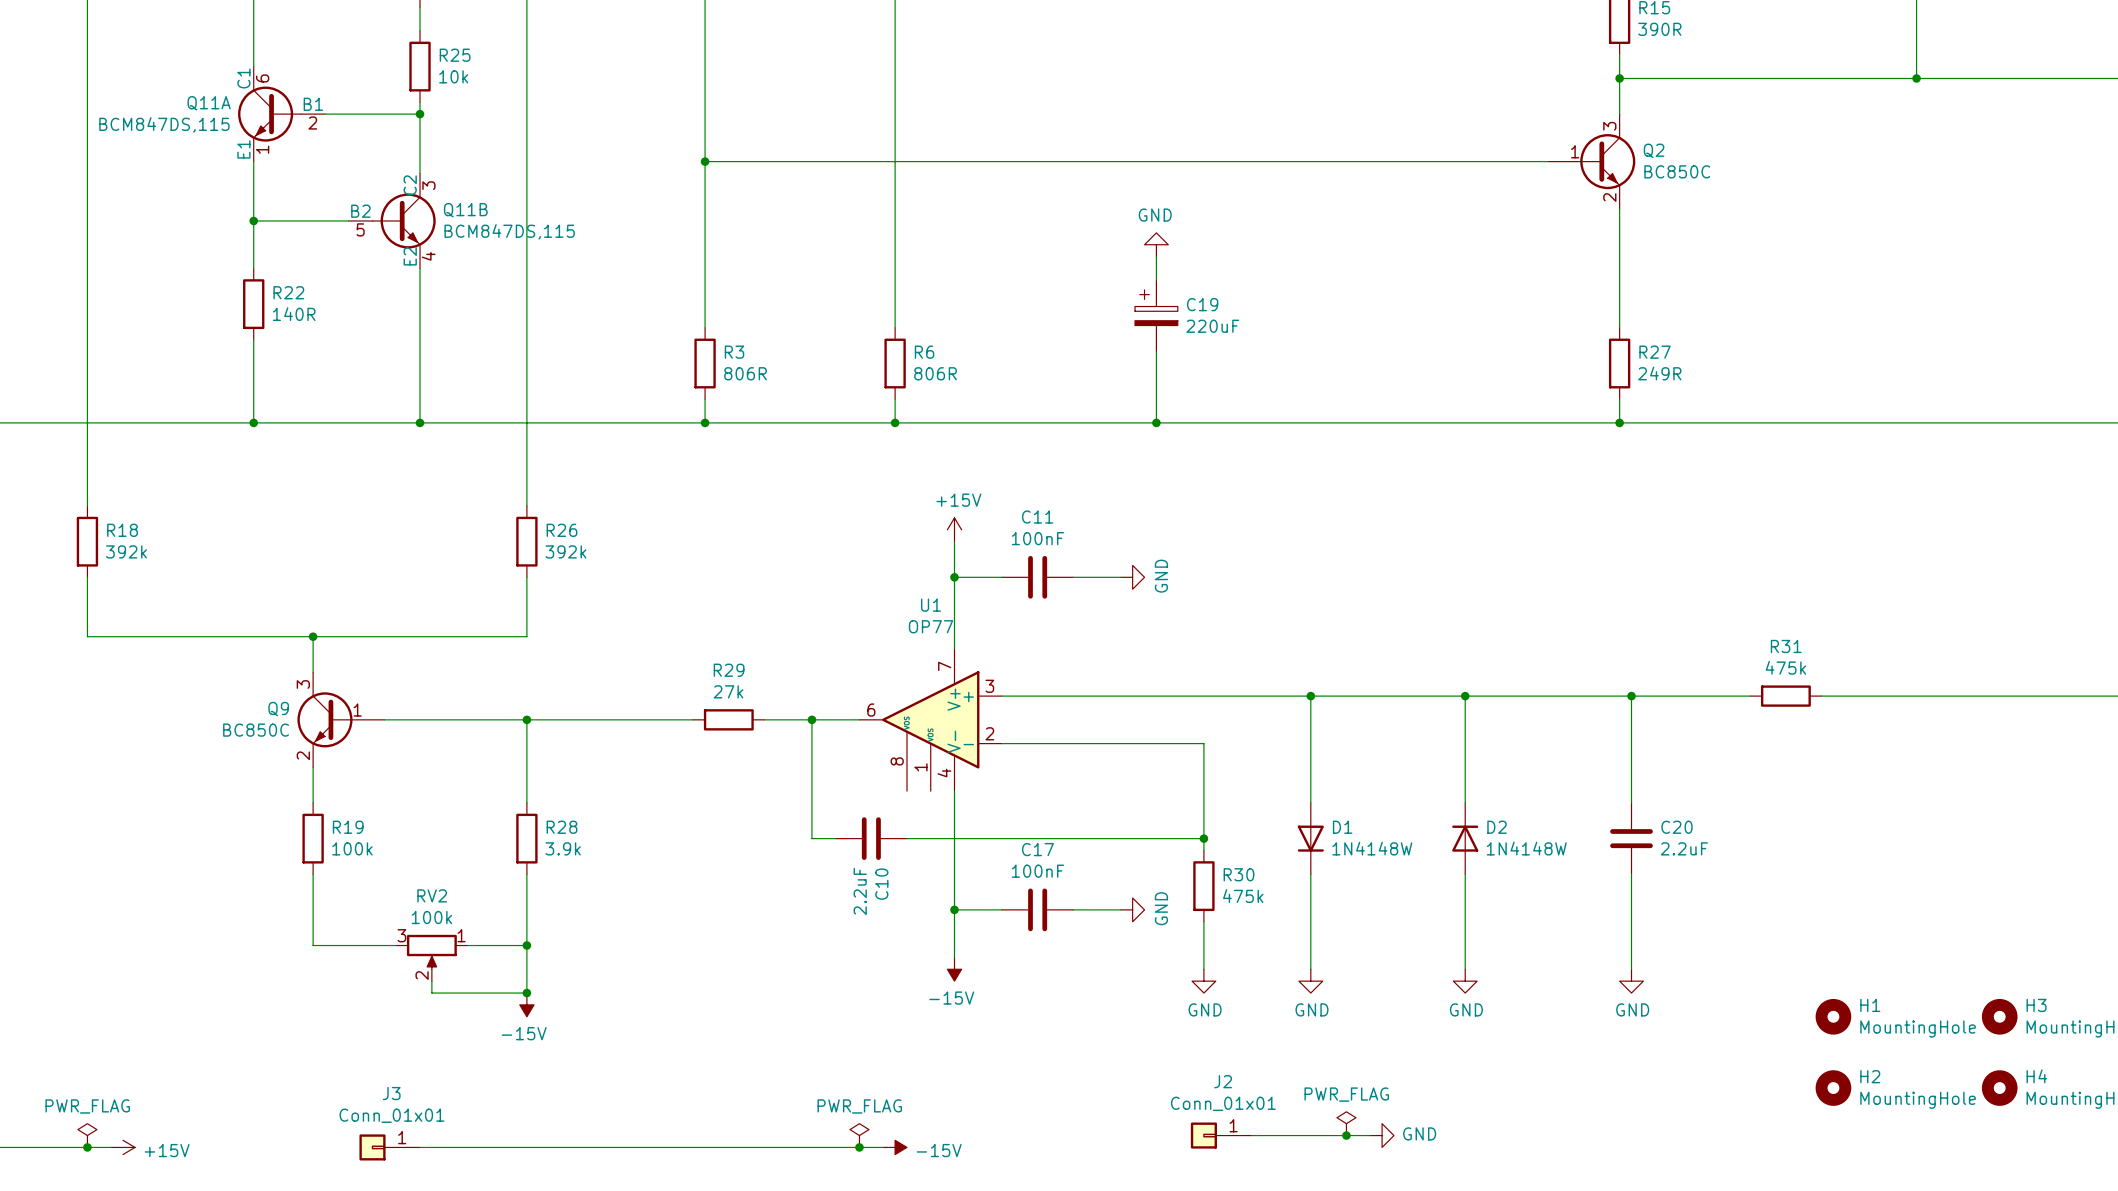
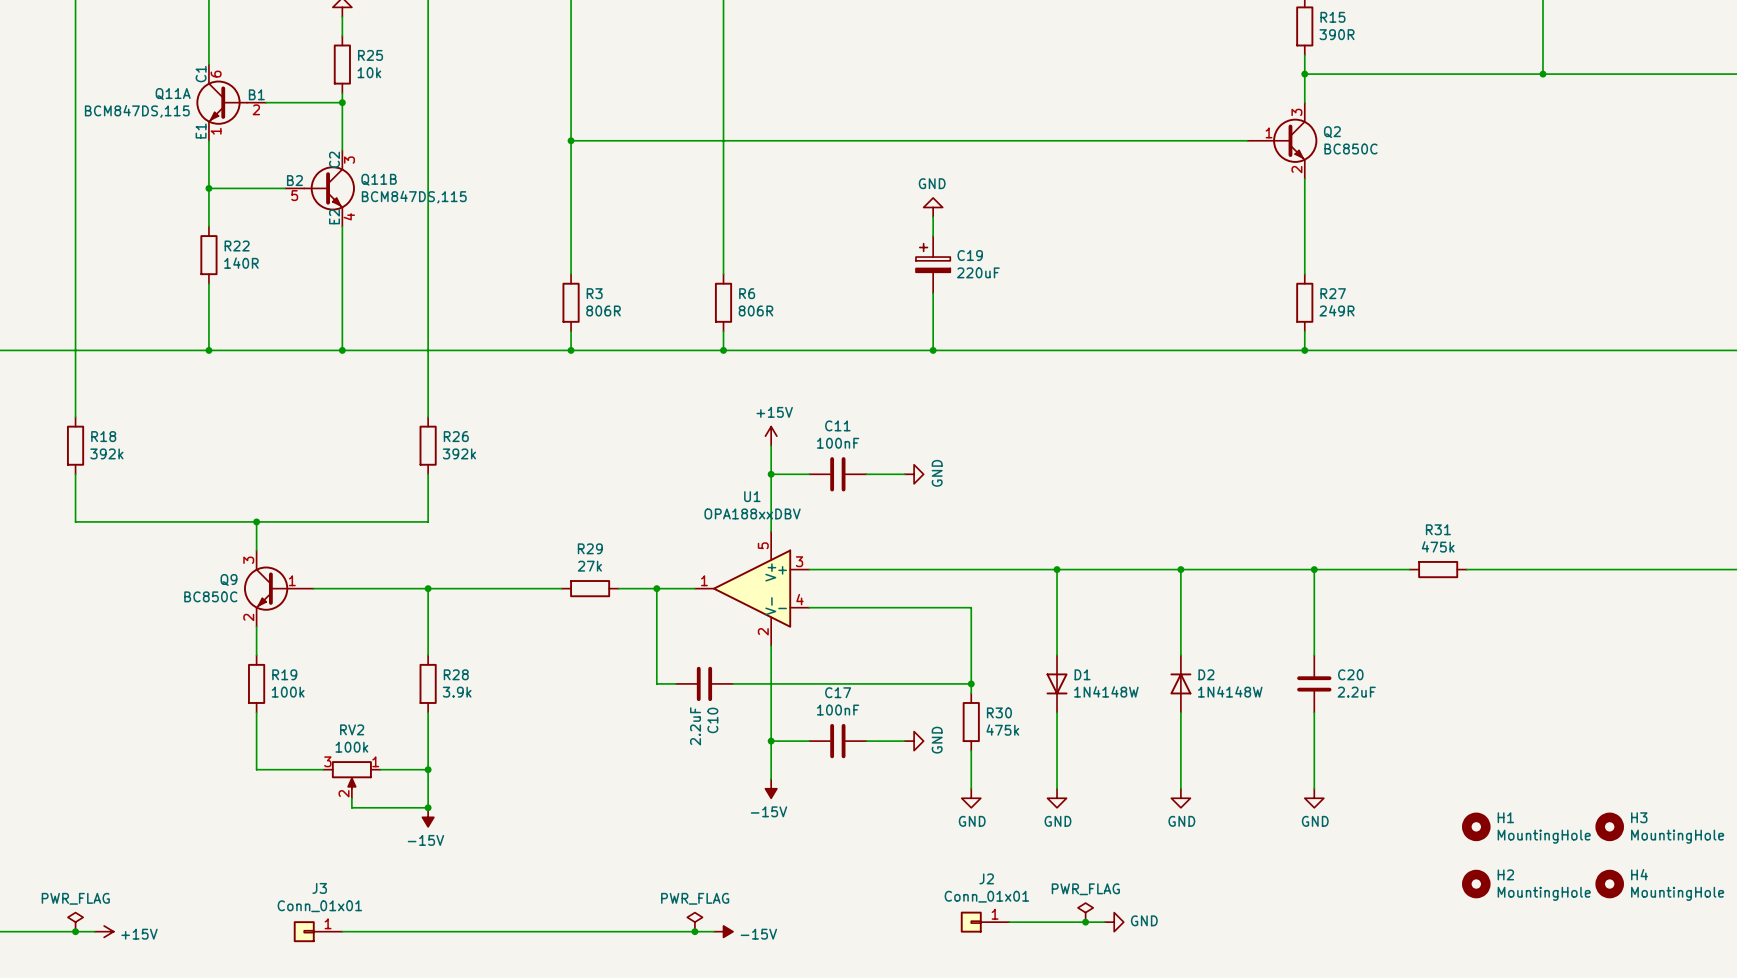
U1 value: OP77 (931, 626) -> OPA188xxDBV (752, 513)
U1 symbol: [859, 648, 1003, 792] -> [694, 531, 810, 646]

